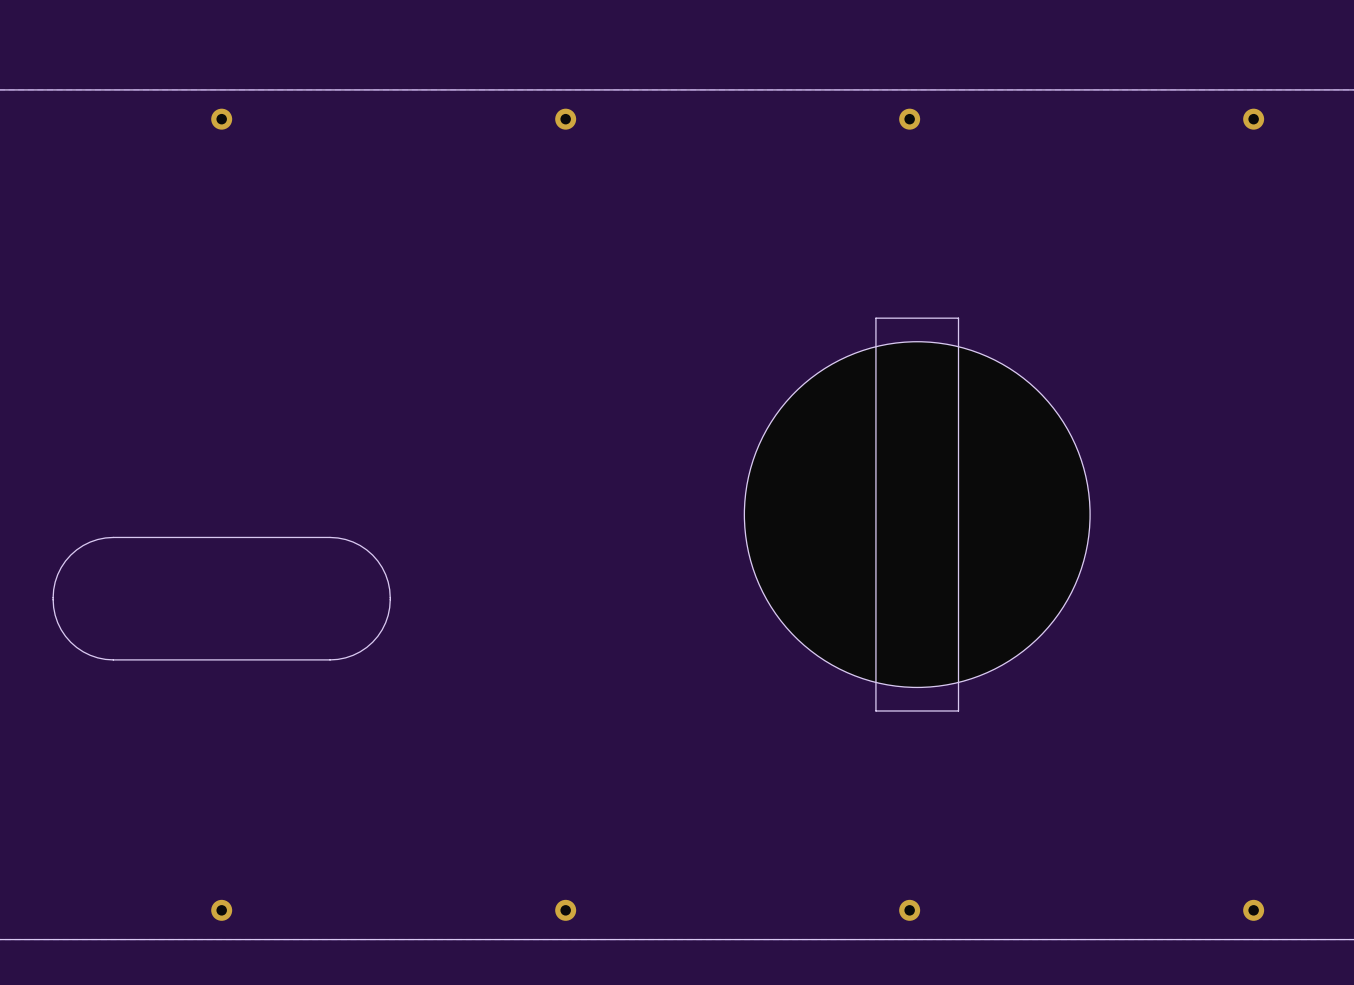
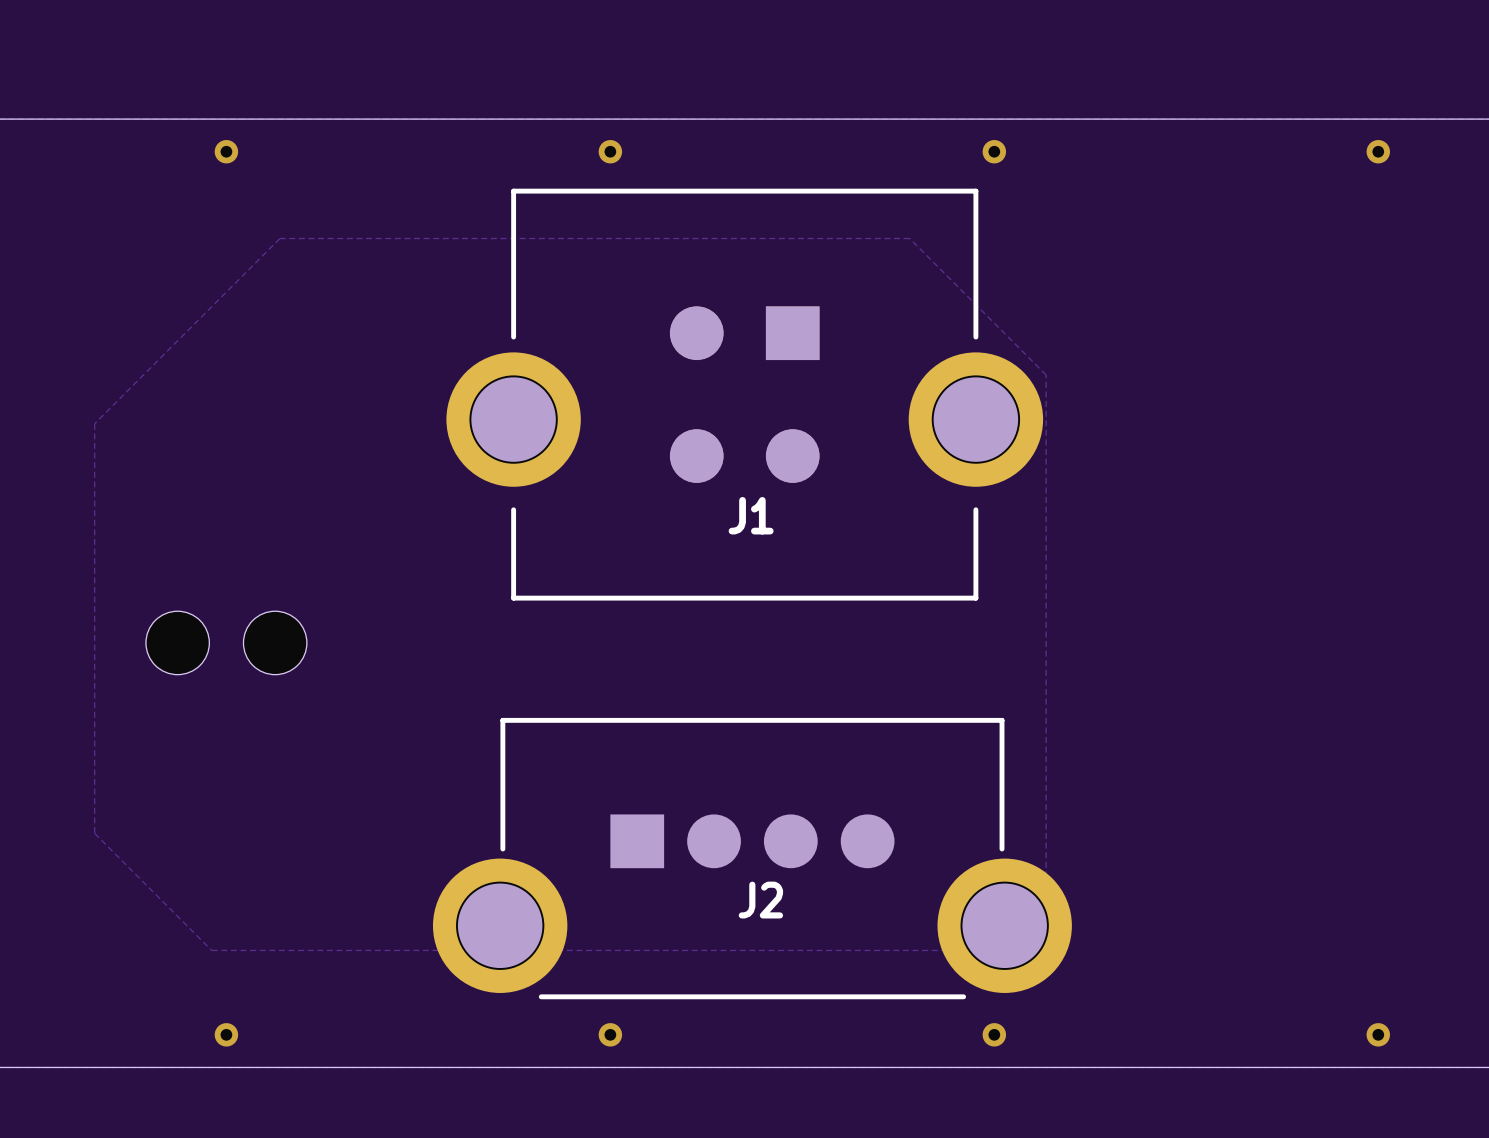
zone outline: none -> (279, 238) (909, 238) (1046, 375) (1046, 887) (982, 950) (211, 950) (94, 833) (94, 423) (279, 238)
board edge: (875, 318) (958, 318) (958, 710) (875, 710) (875, 318) -> none
J1: none -> (744, 394)
hole: (917, 514) -> none
board edge: (113, 537) (330, 537) (345, 539) (366, 549) (382, 567) (389, 589) (388, 615) (377, 636) (366, 647) (353, 655) (337, 659) (113, 659) (97, 657) (76, 647) (61, 629) (53, 607) (53, 589) (61, 567) (76, 549) (97, 539) (113, 537) -> none
part: none -> (226, 642)
J2: none -> (752, 858)

